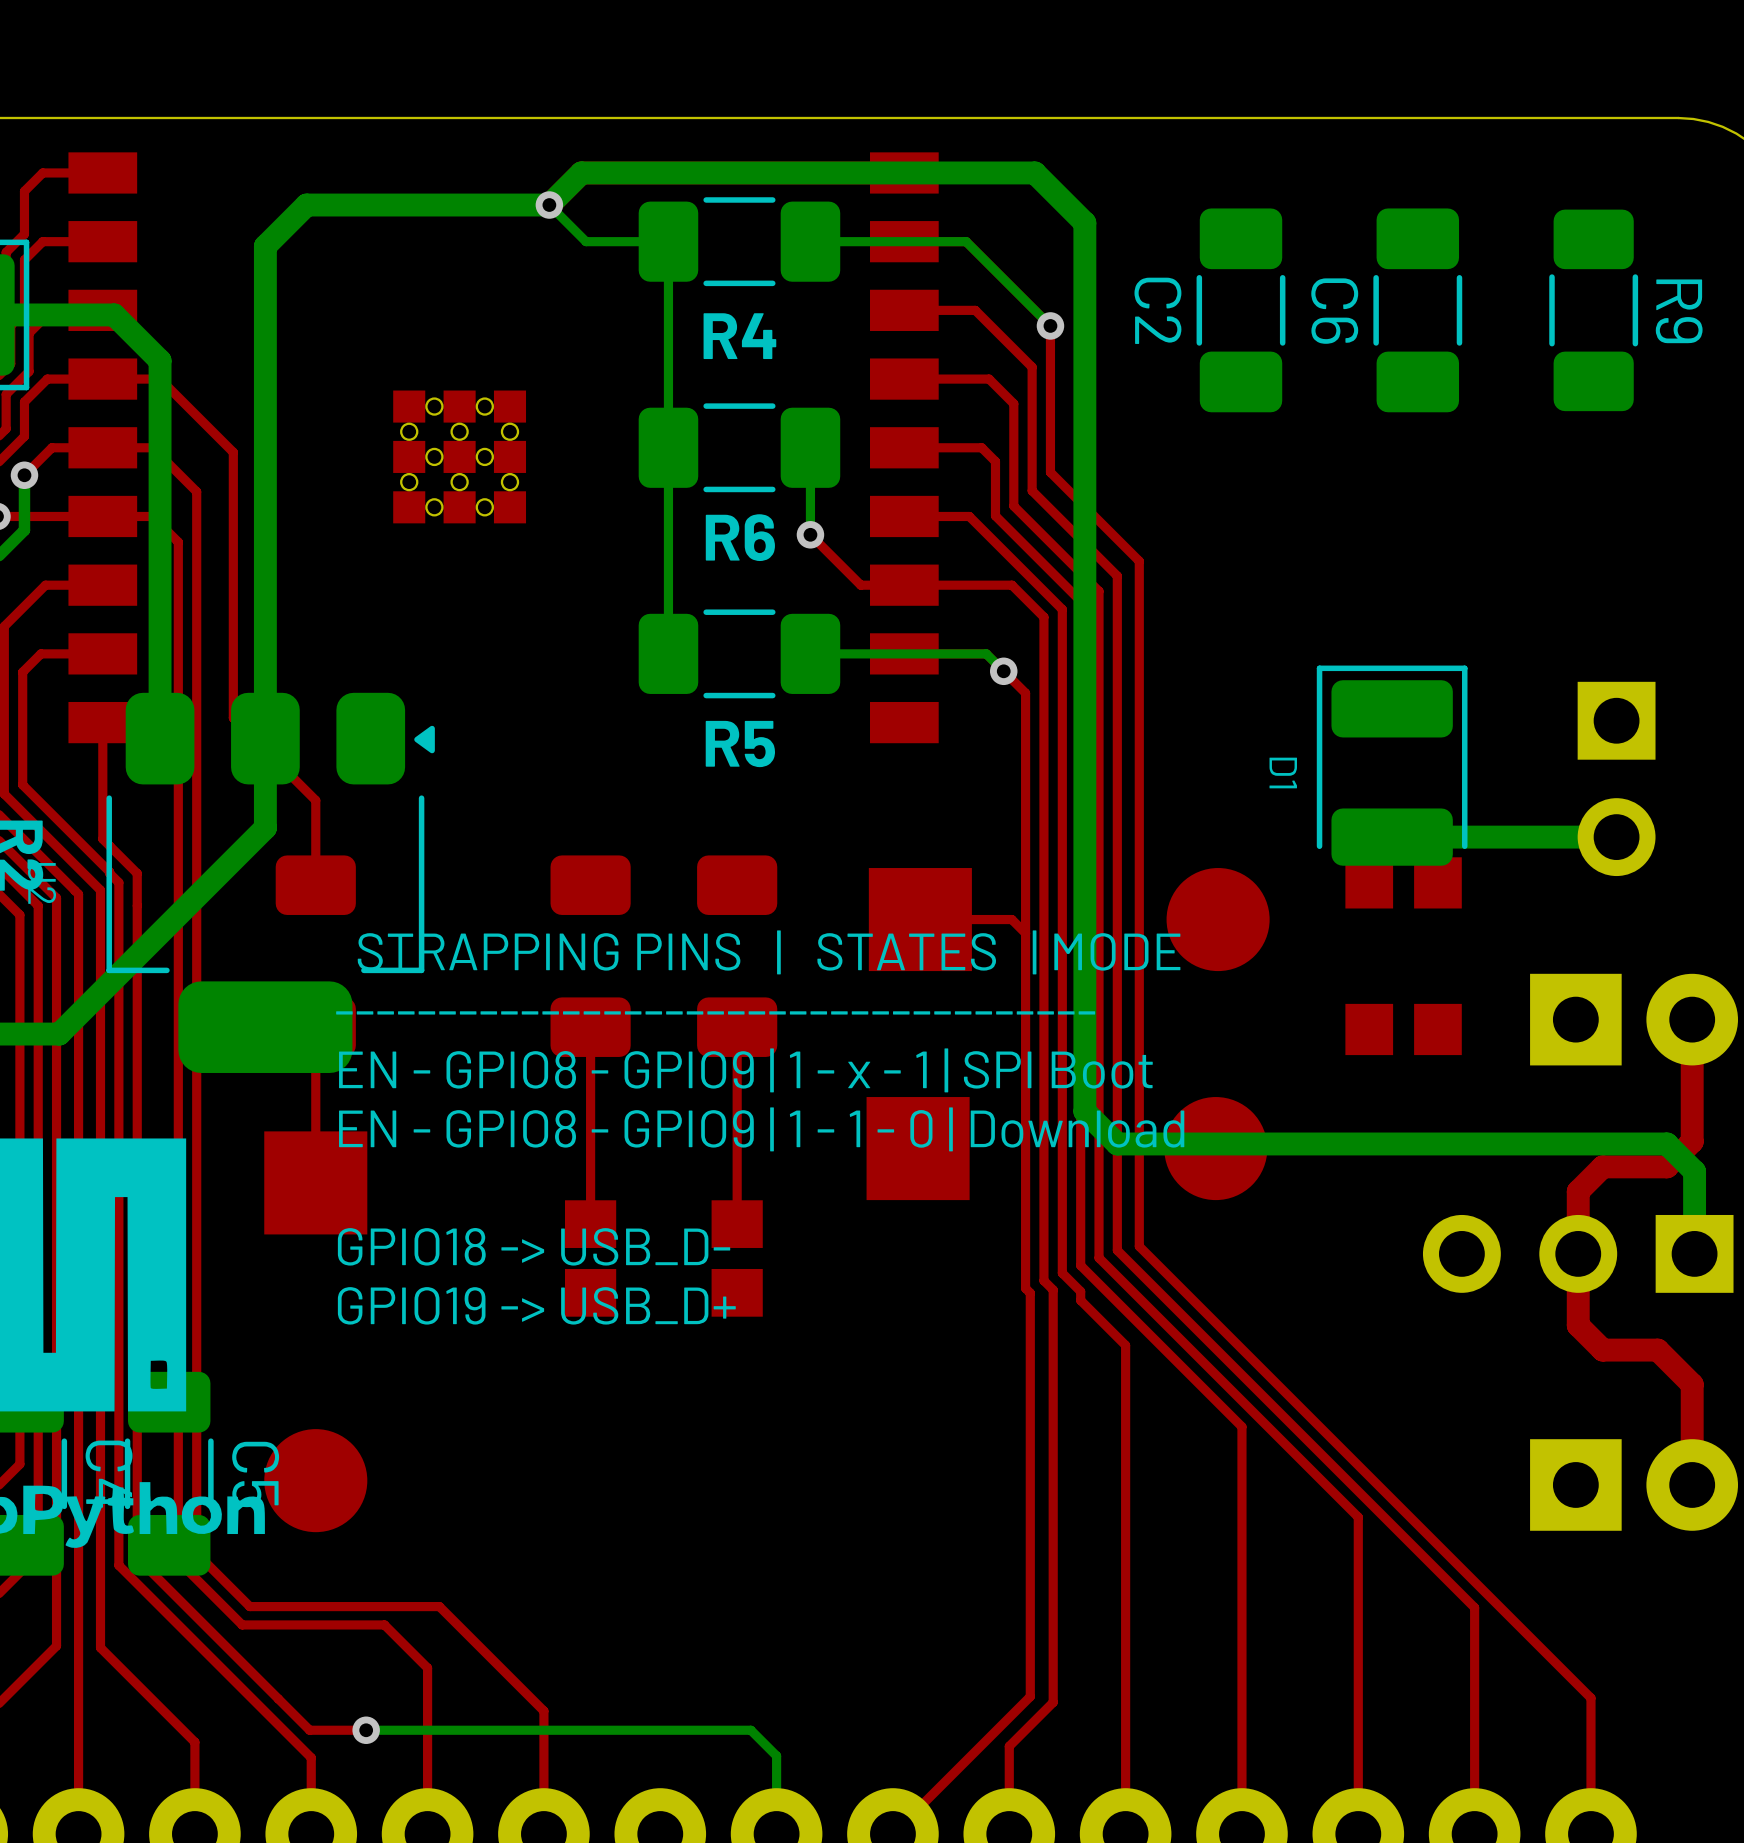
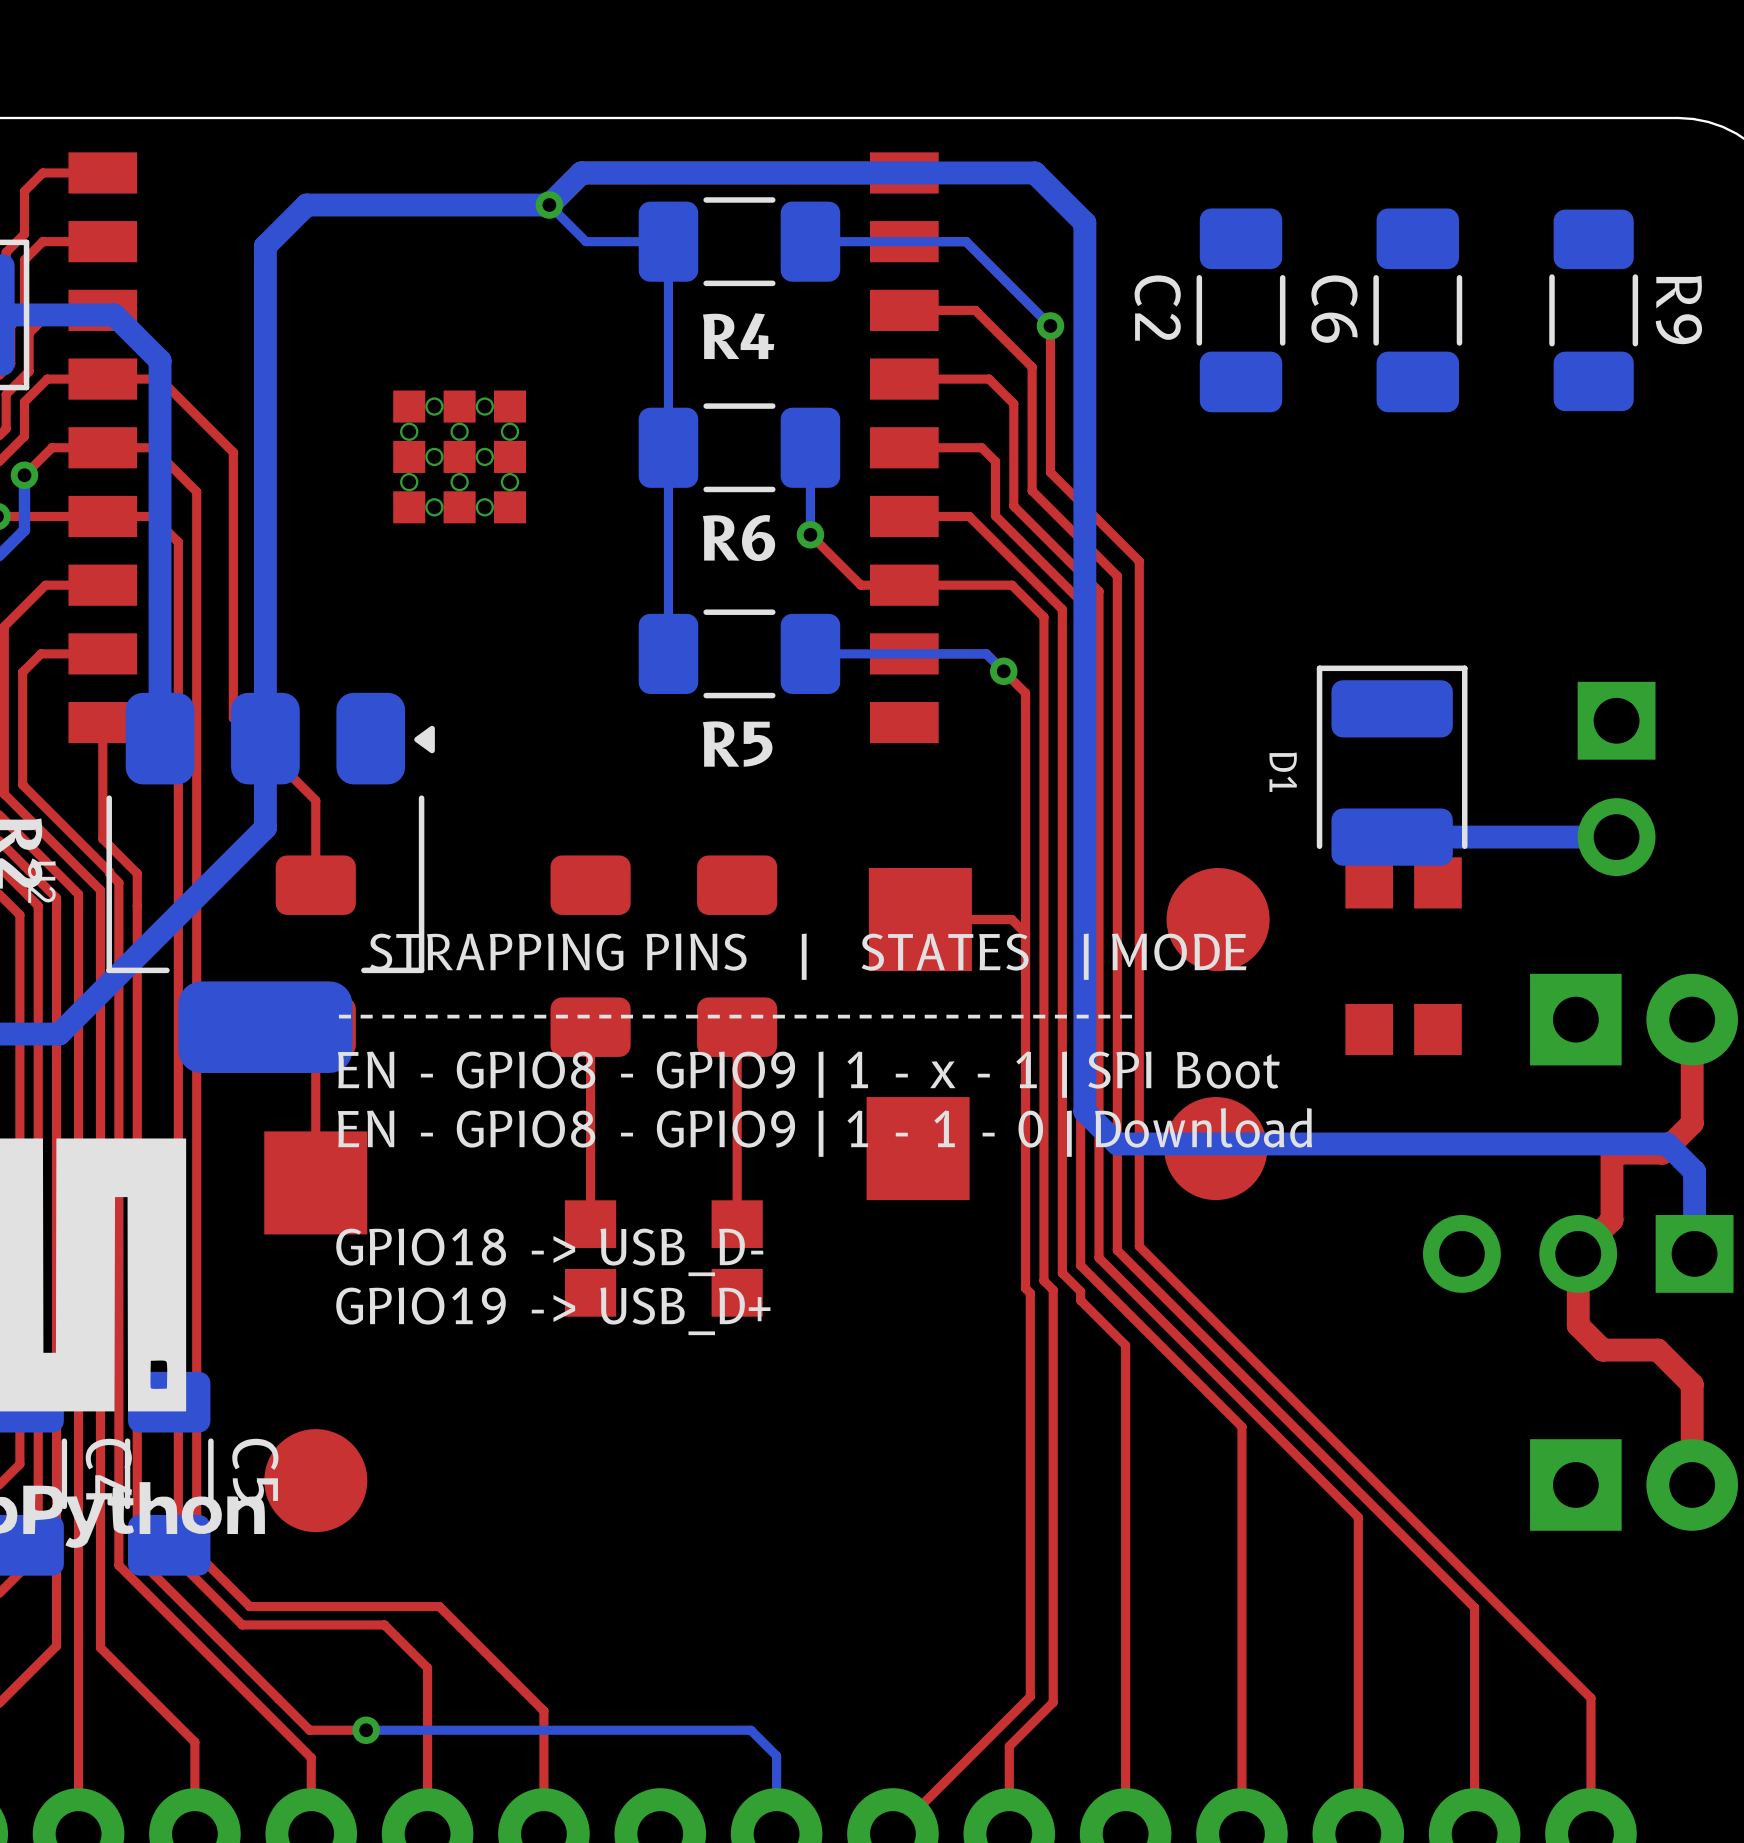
top track: (1692, 1123) (1692, 1141) (1666, 1166) (1602, 1166) (1578, 1191) (1578, 1253) -> (1692, 1123) (1662, 1153) (1612, 1153) (1612, 1220) (1578, 1253)

